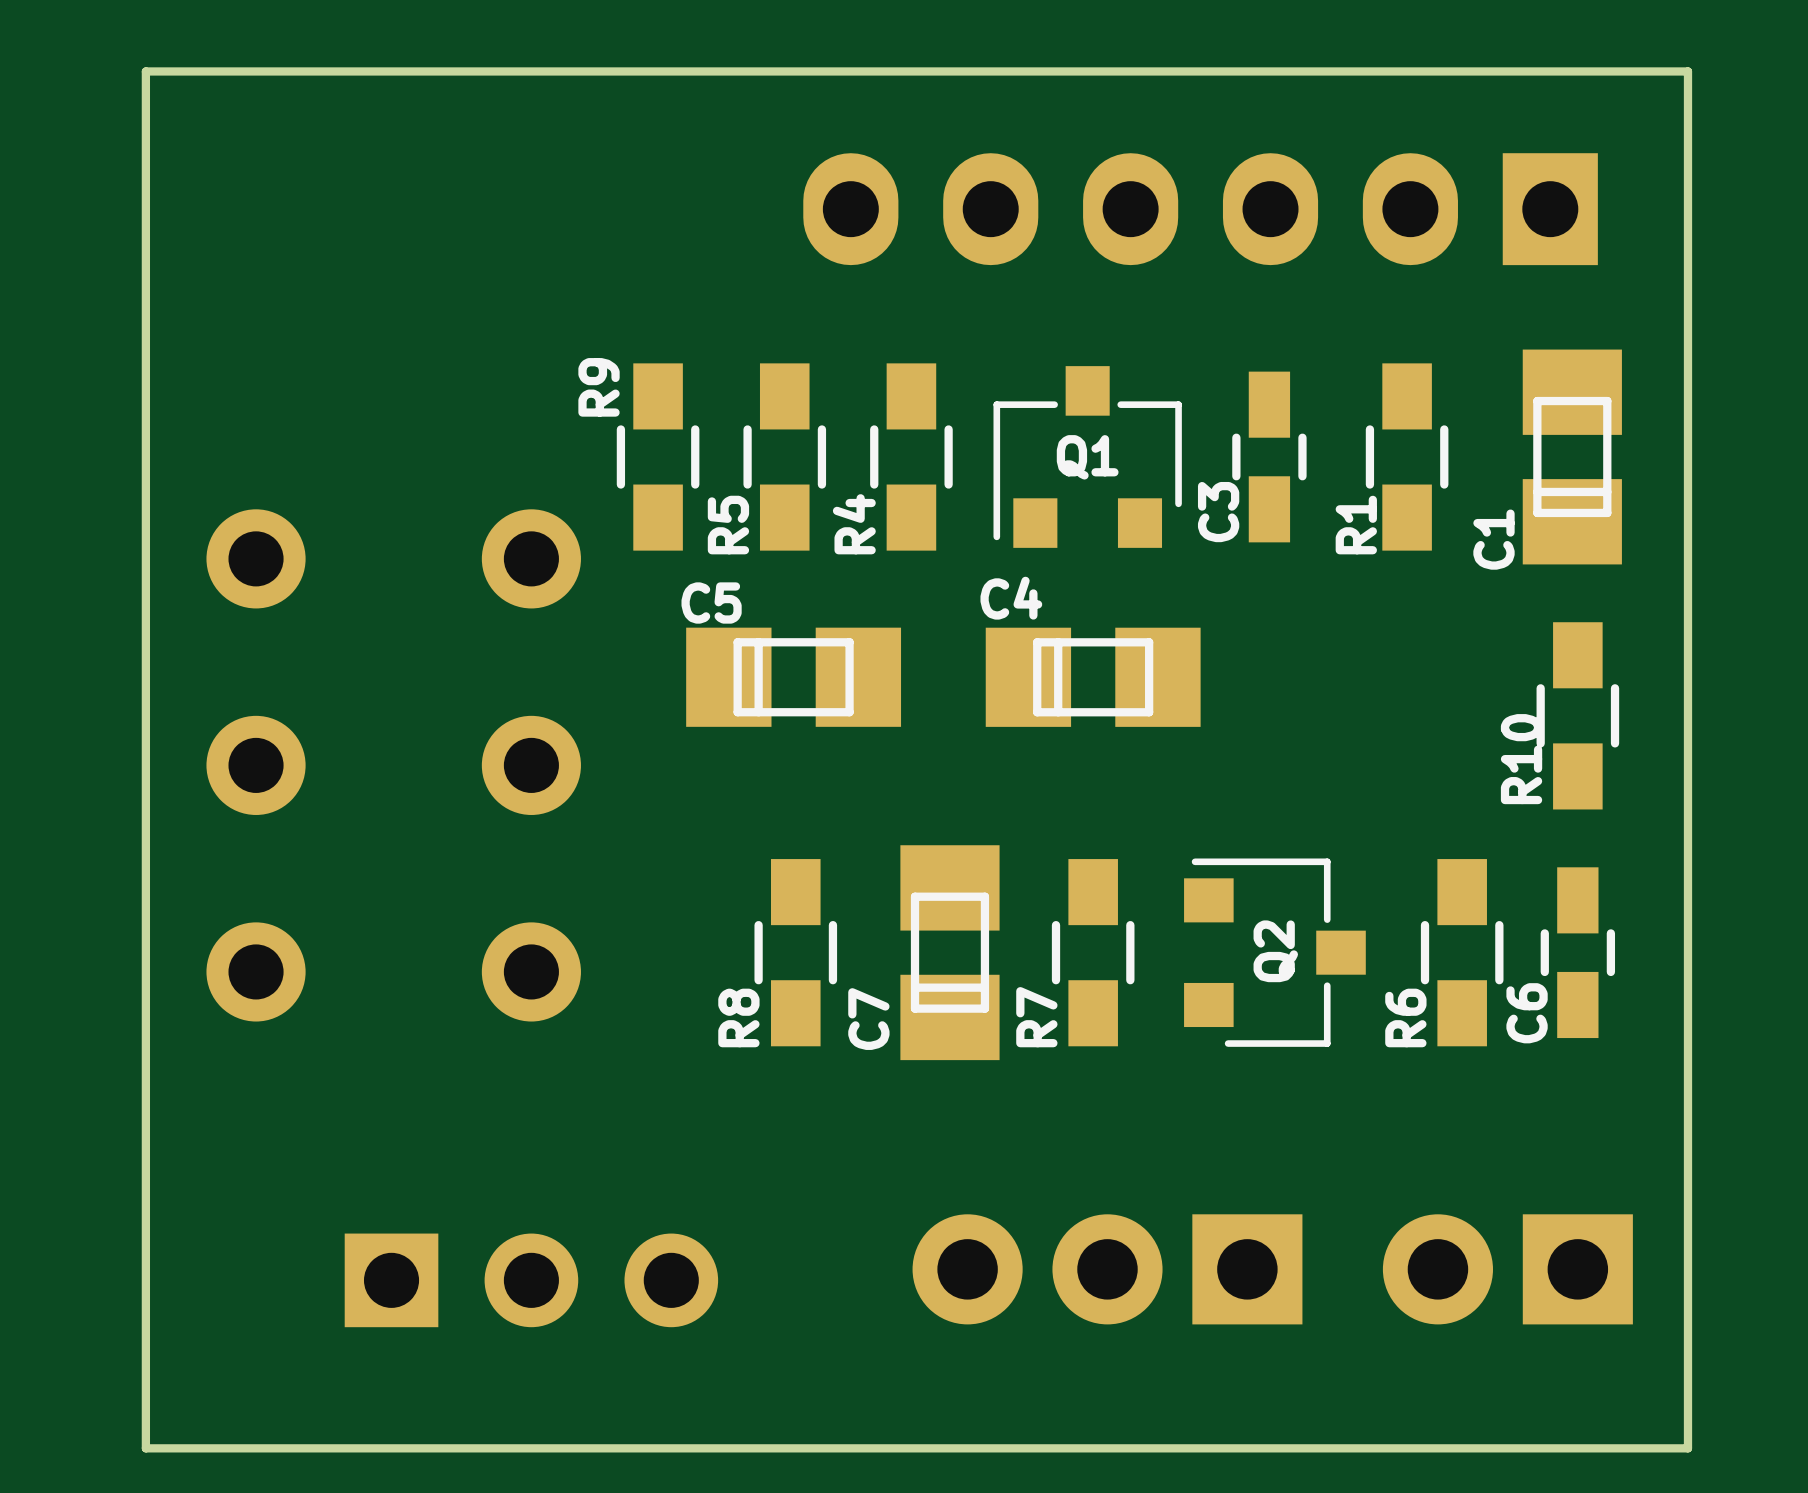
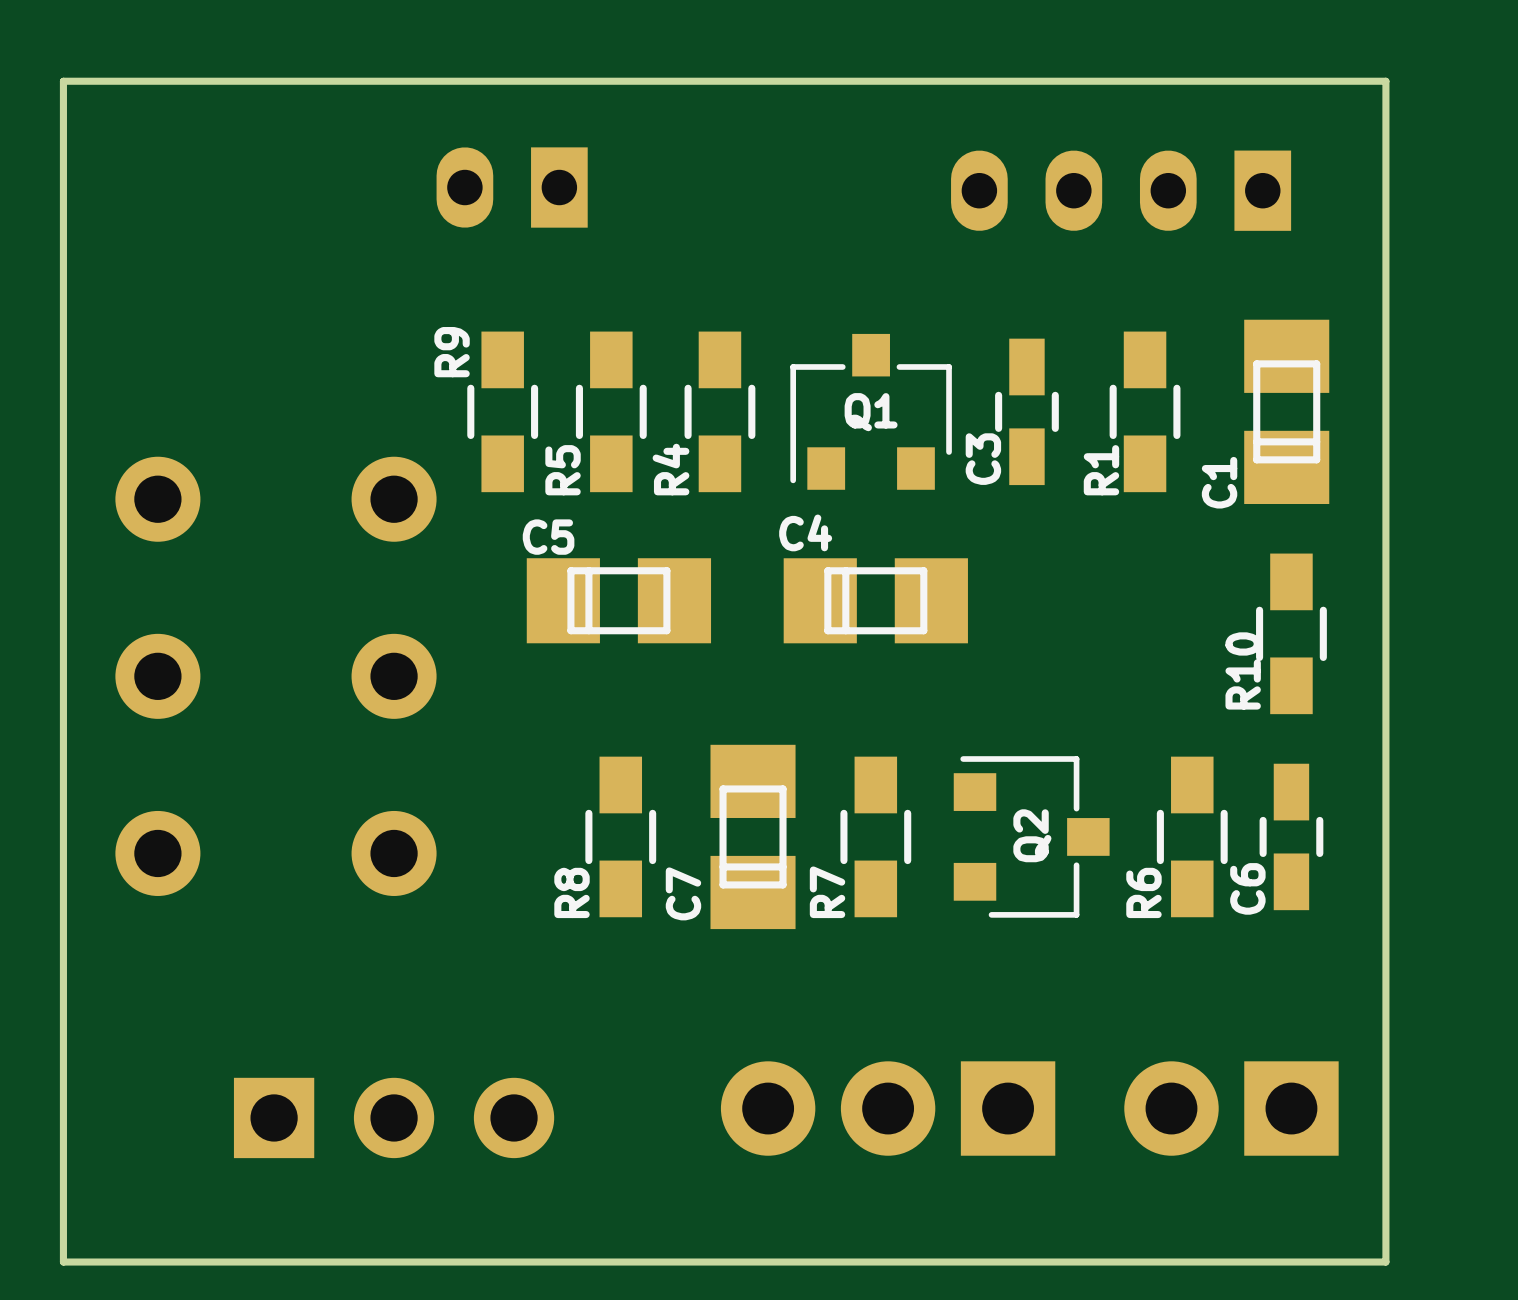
part: none -> (512, 187)
part: none -> (1121, 190)
part: (1200, 209) -> none

